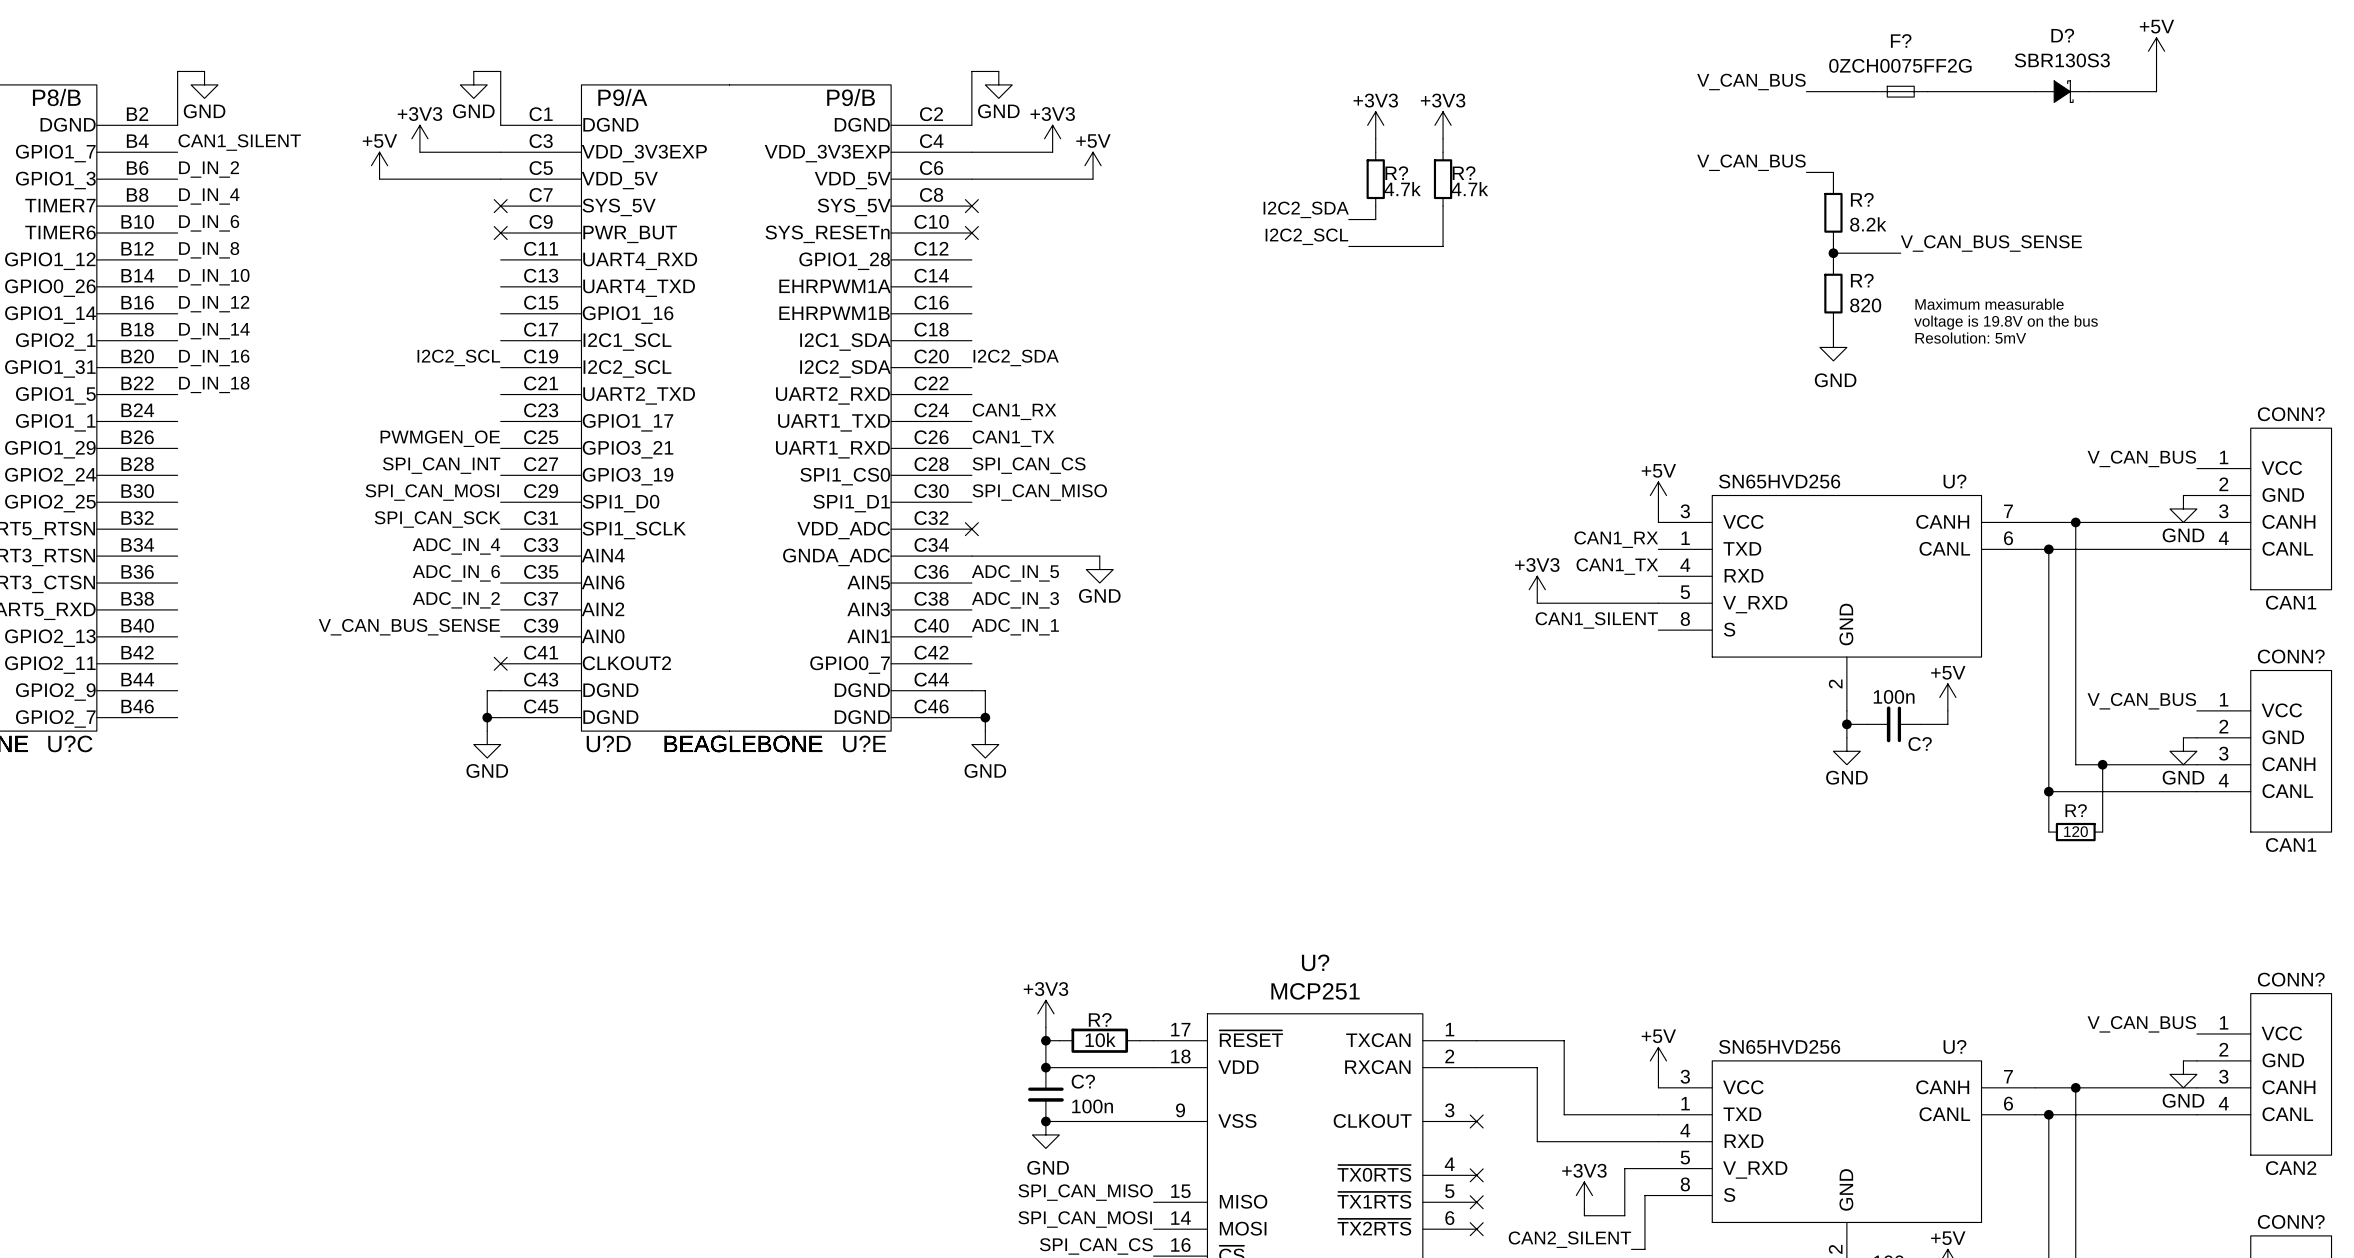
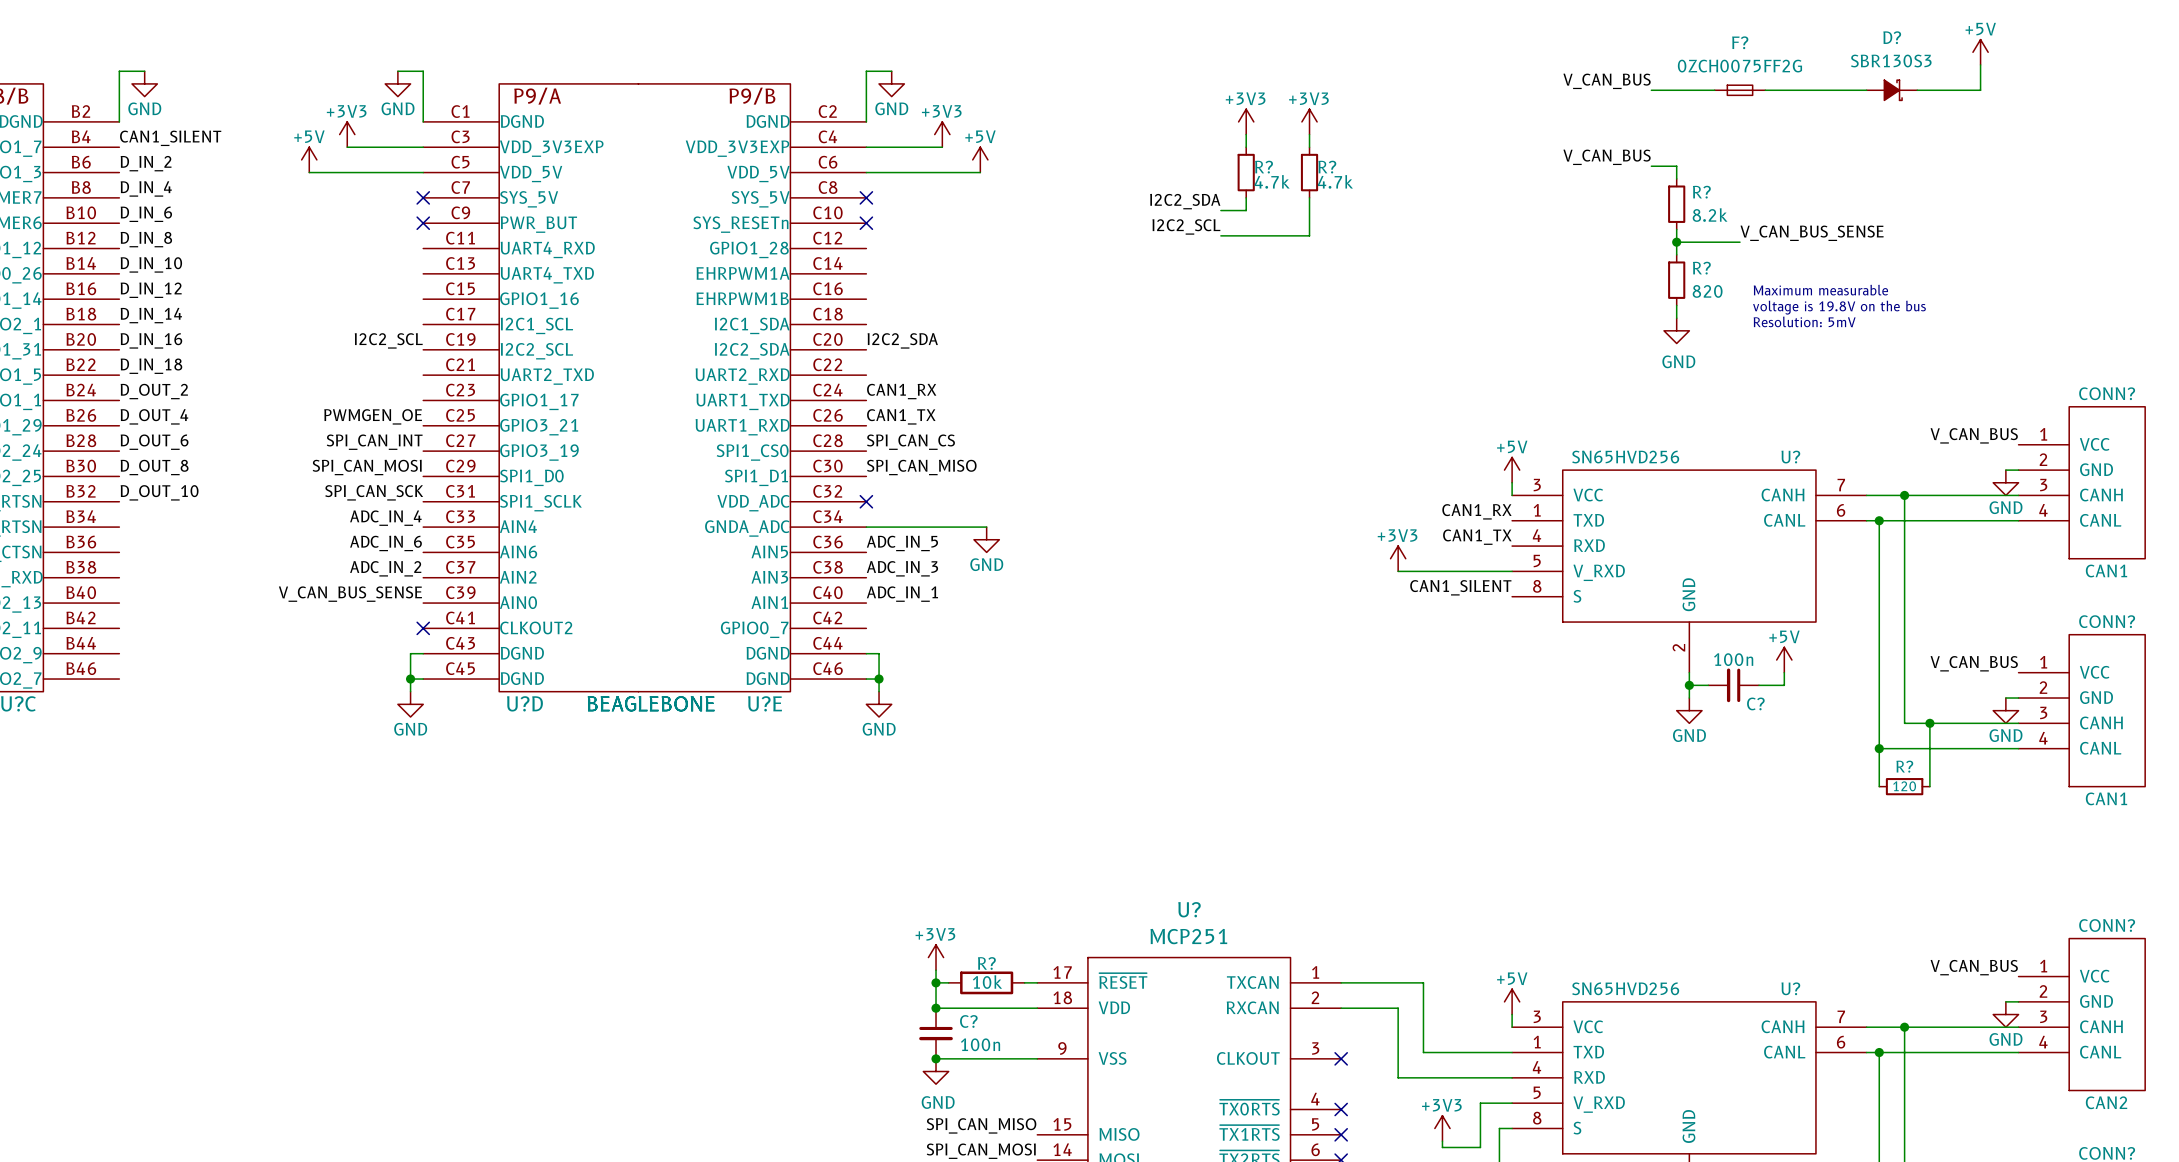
label: none -> D_OUT_2 (154, 391)
label: none -> D_OUT_4 (154, 416)
label: none -> D_OUT_6 (154, 442)
label: none -> D_OUT_8 (154, 467)
label: none -> D_OUT_10 (159, 492)

